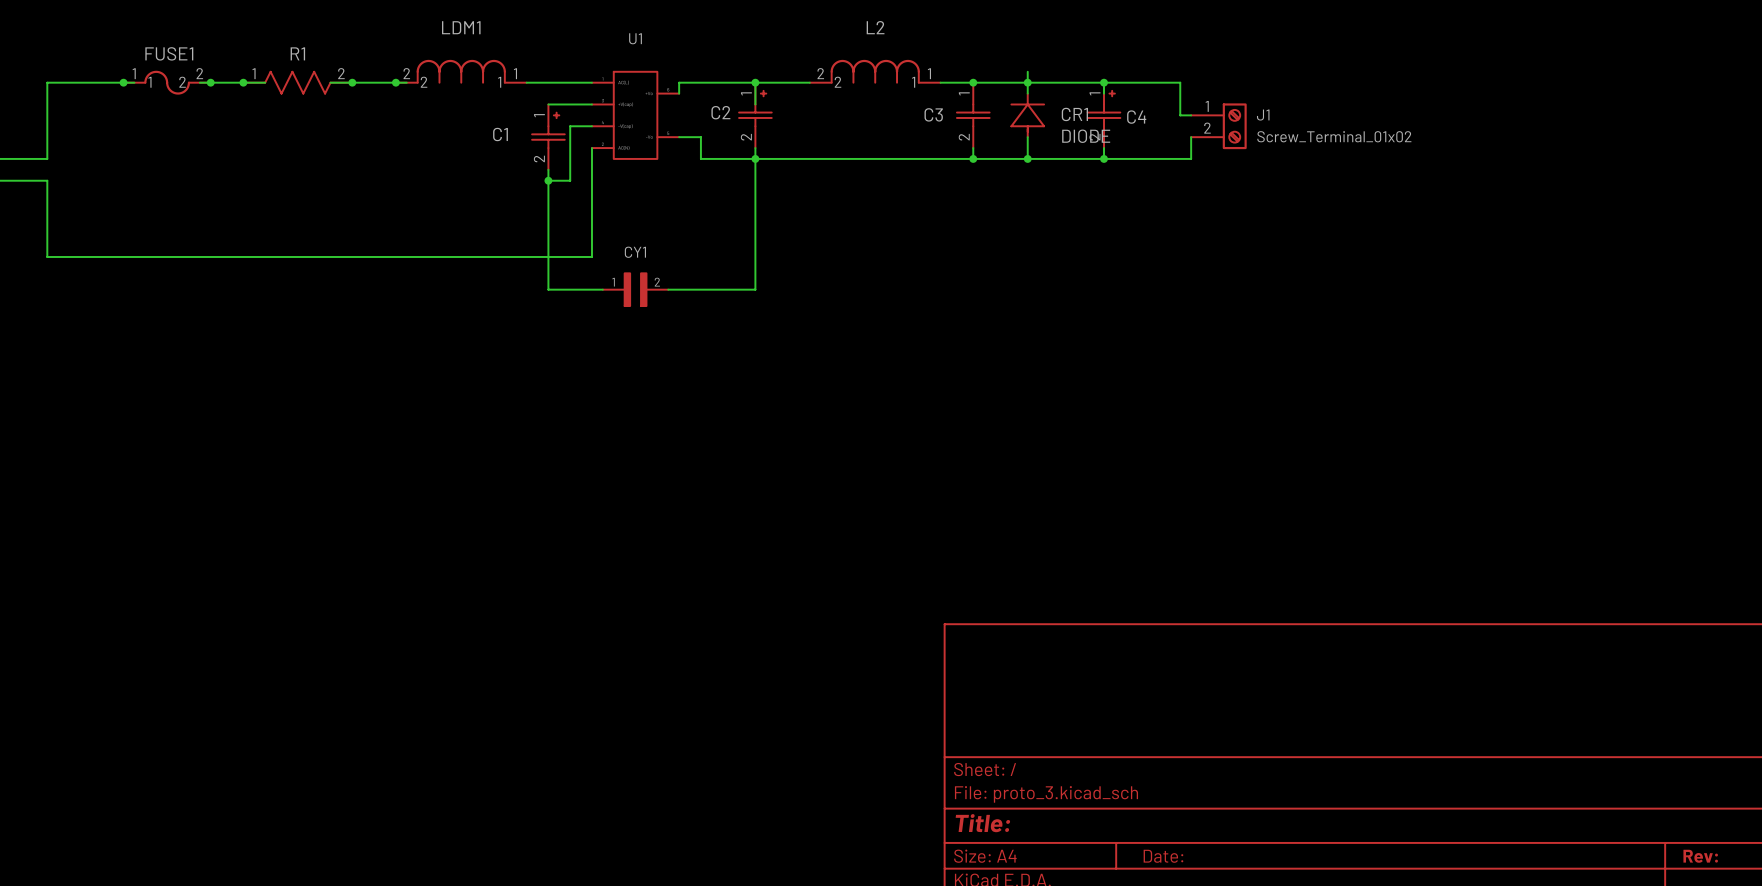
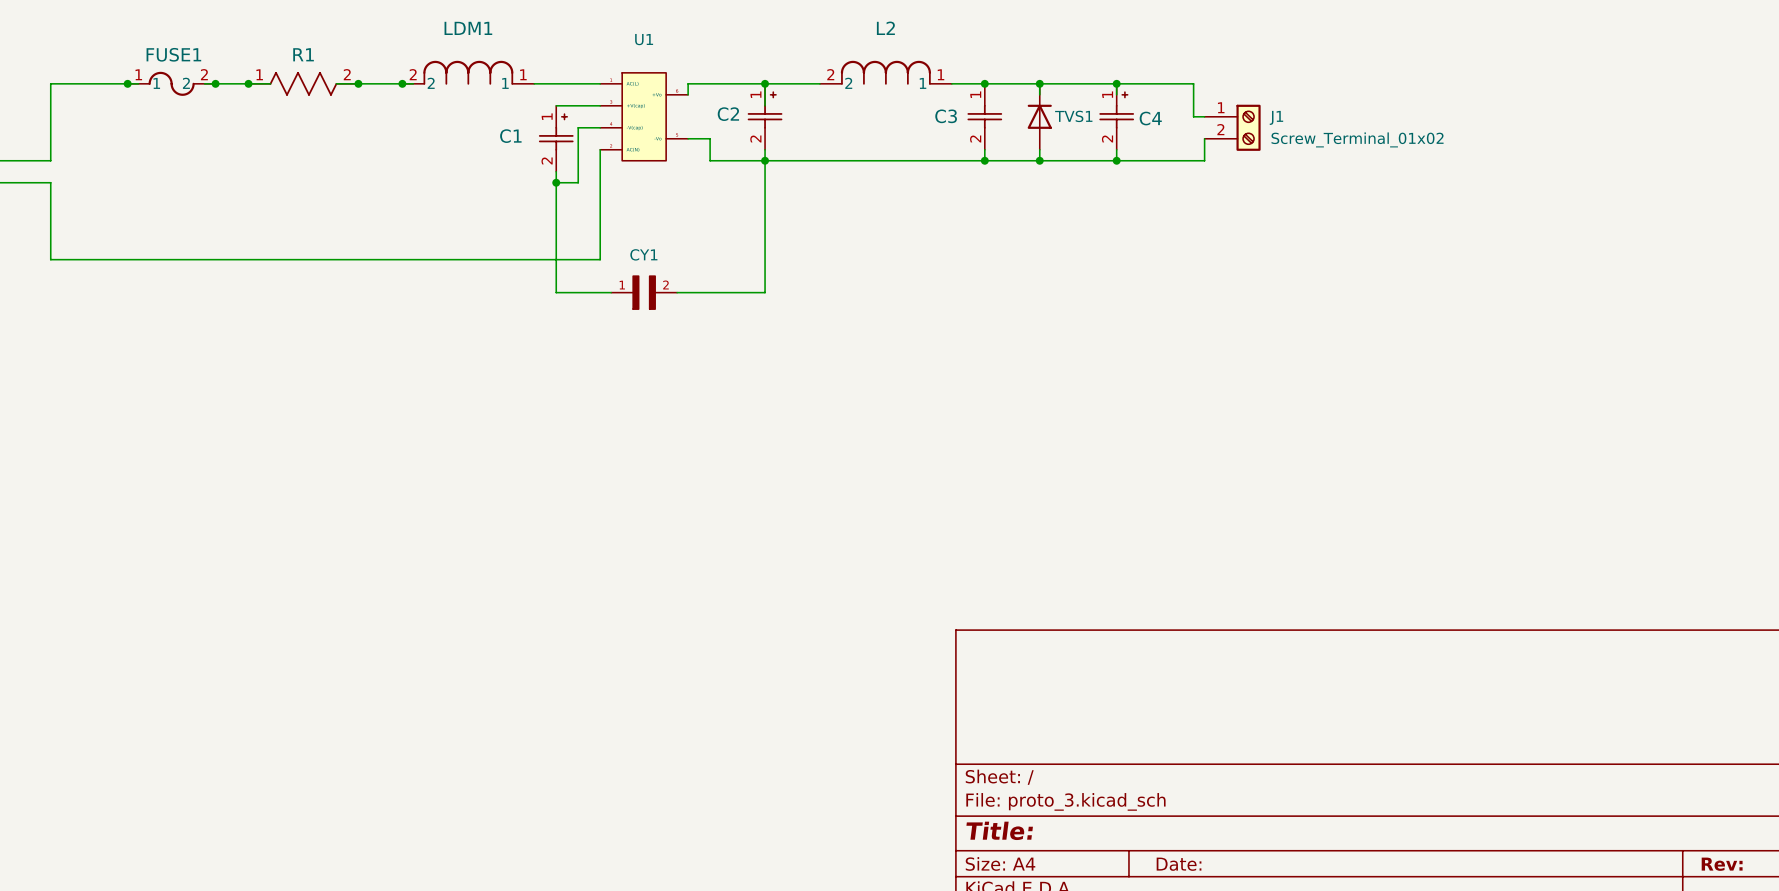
wire: (1027, 71) (1027, 82) -> none
CR1: DIODE (1027, 115) -> none
TVS1: none -> (1039, 116)

